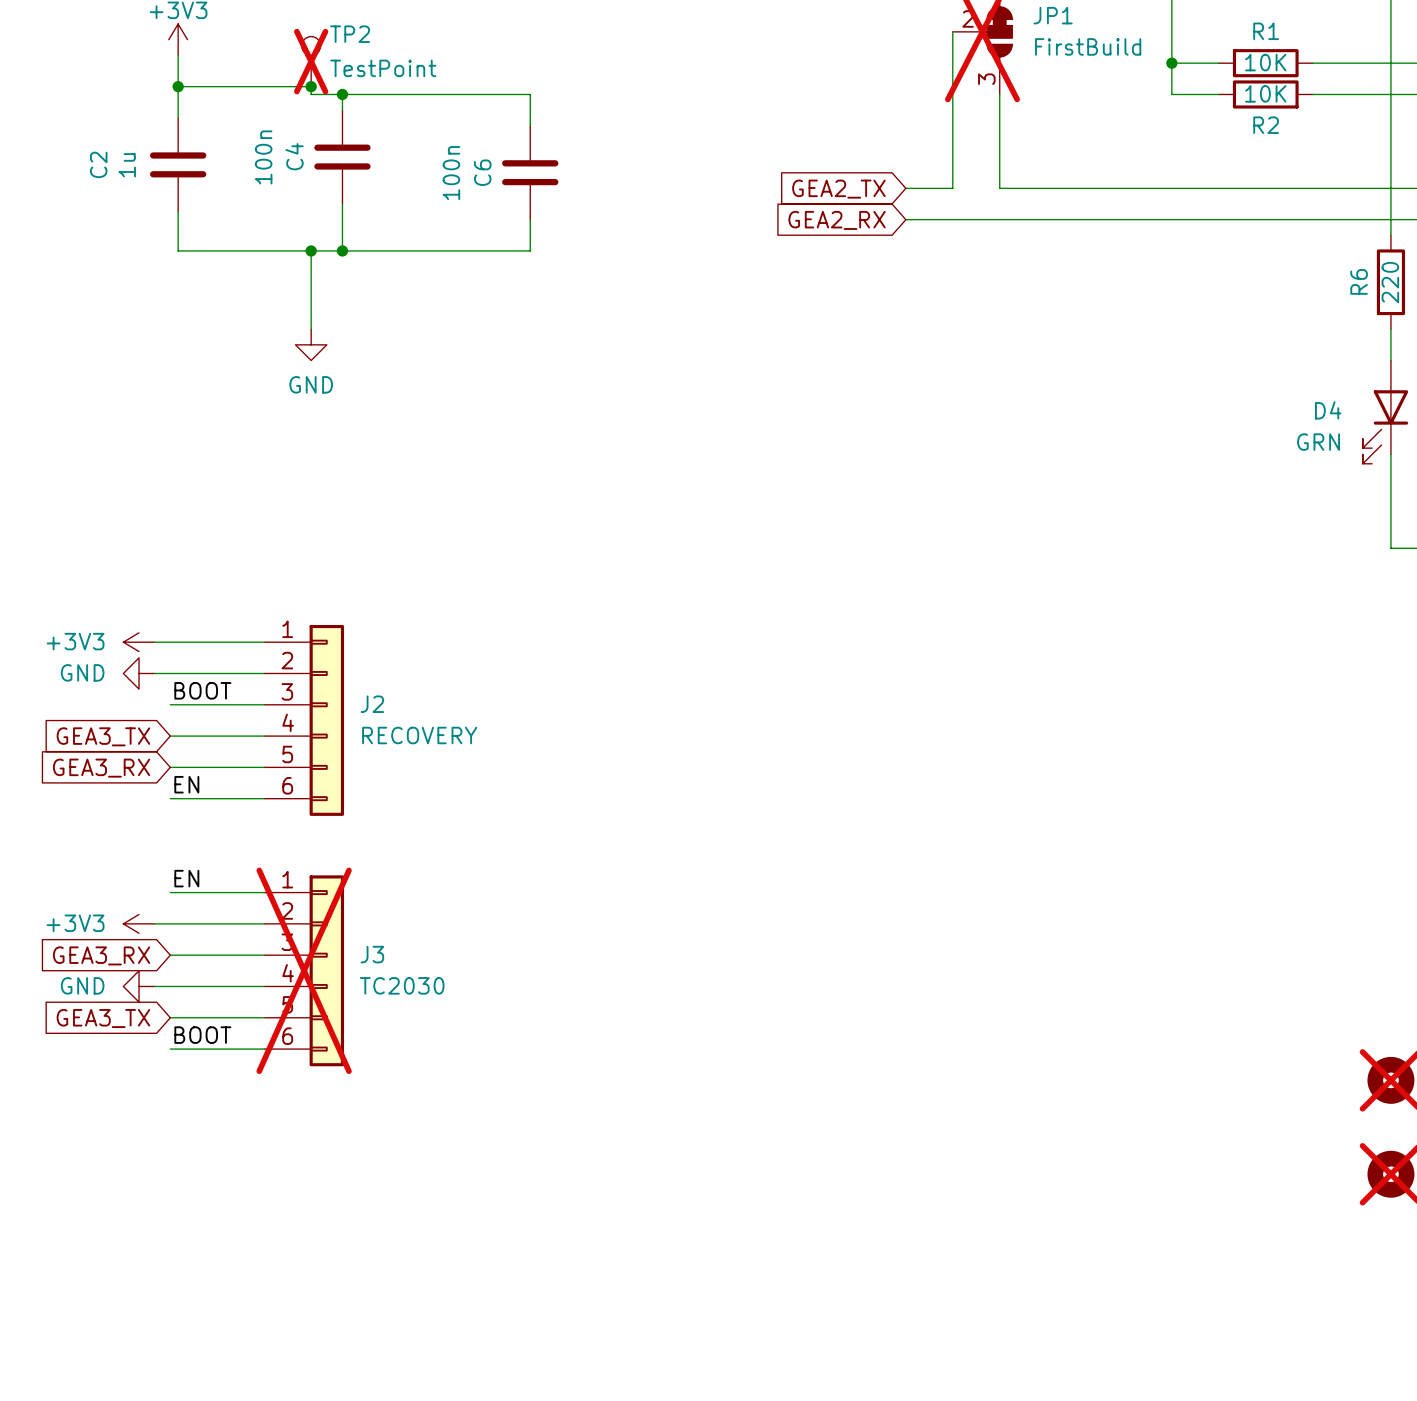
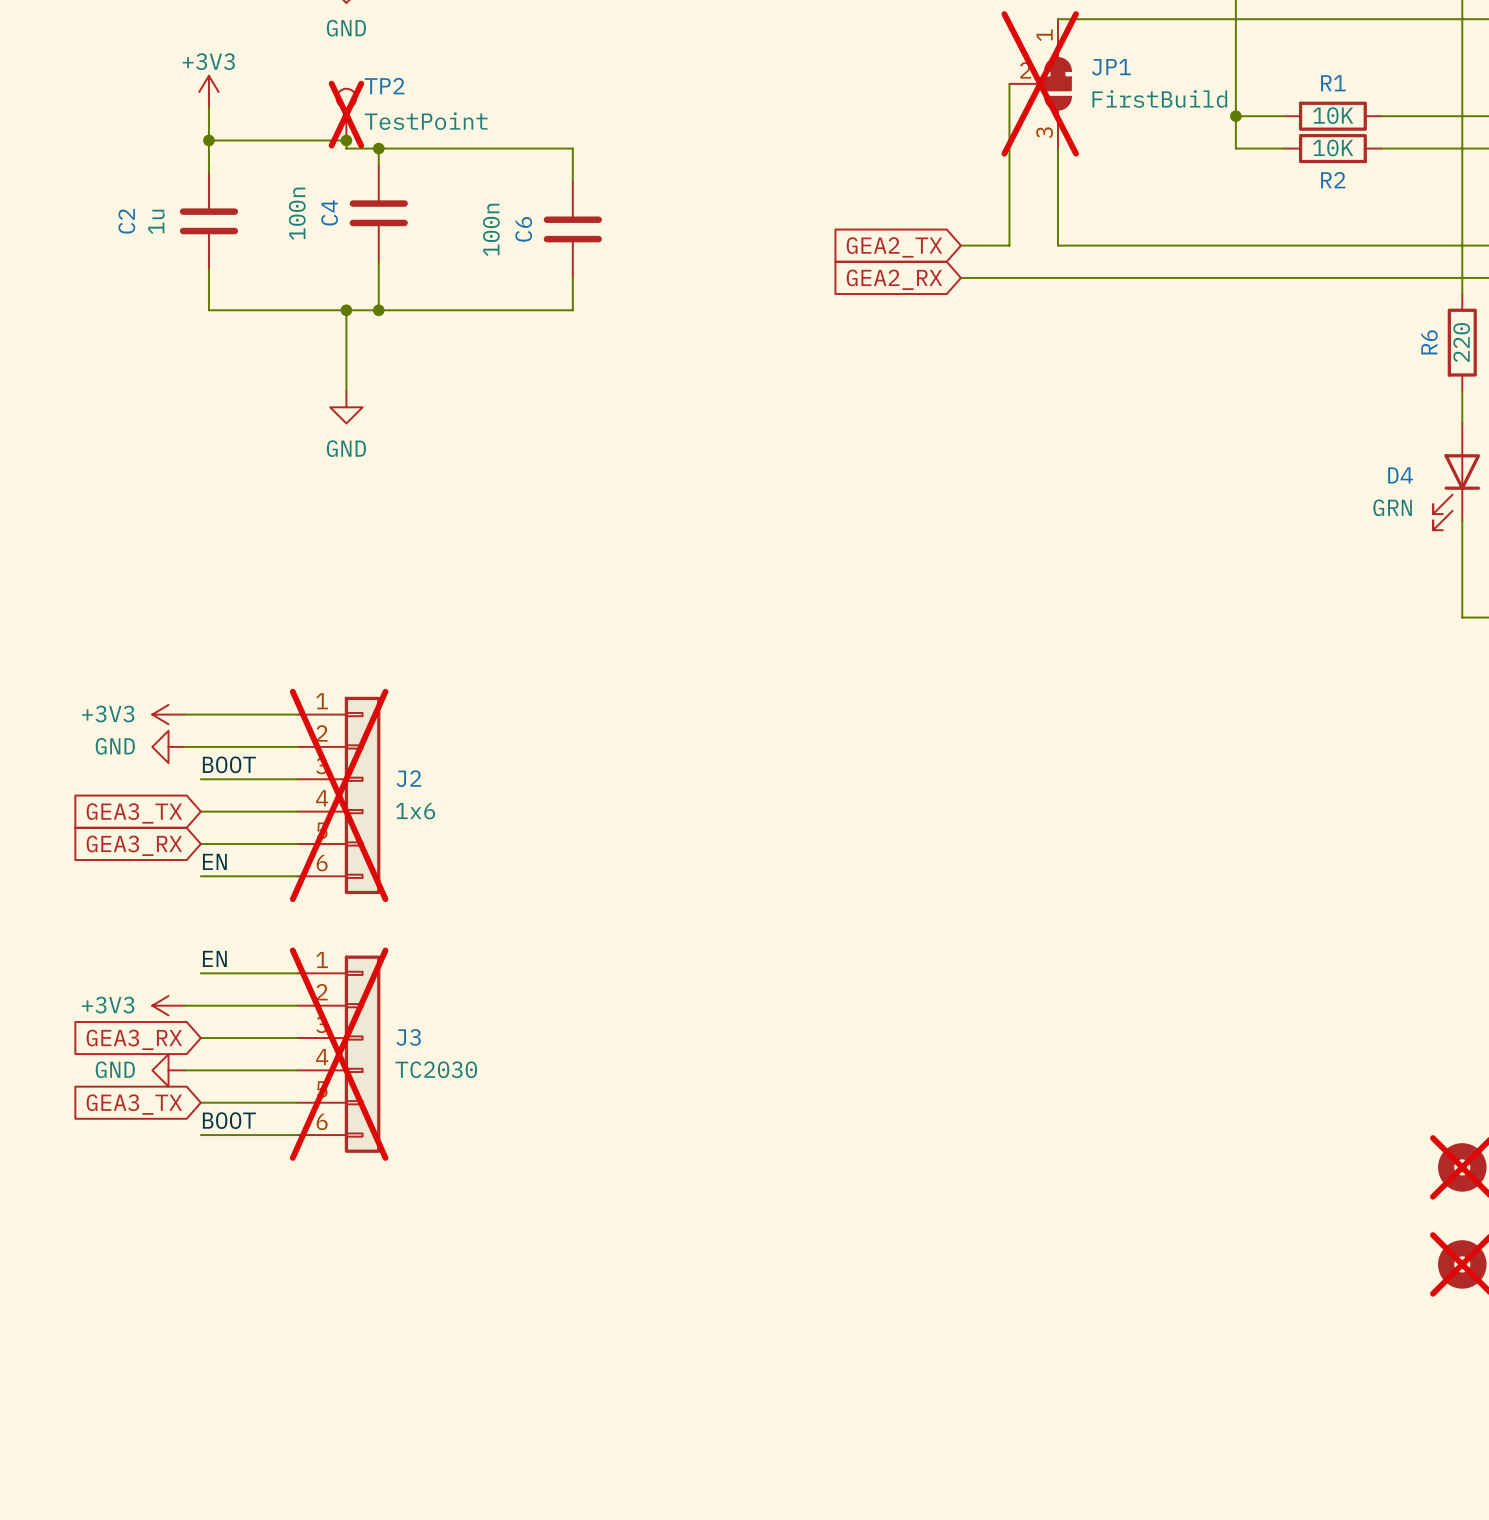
J2 do-not-place cross: none -> (339, 795)
J2 value: RECOVERY (419, 735) -> 1x6 (415, 811)

